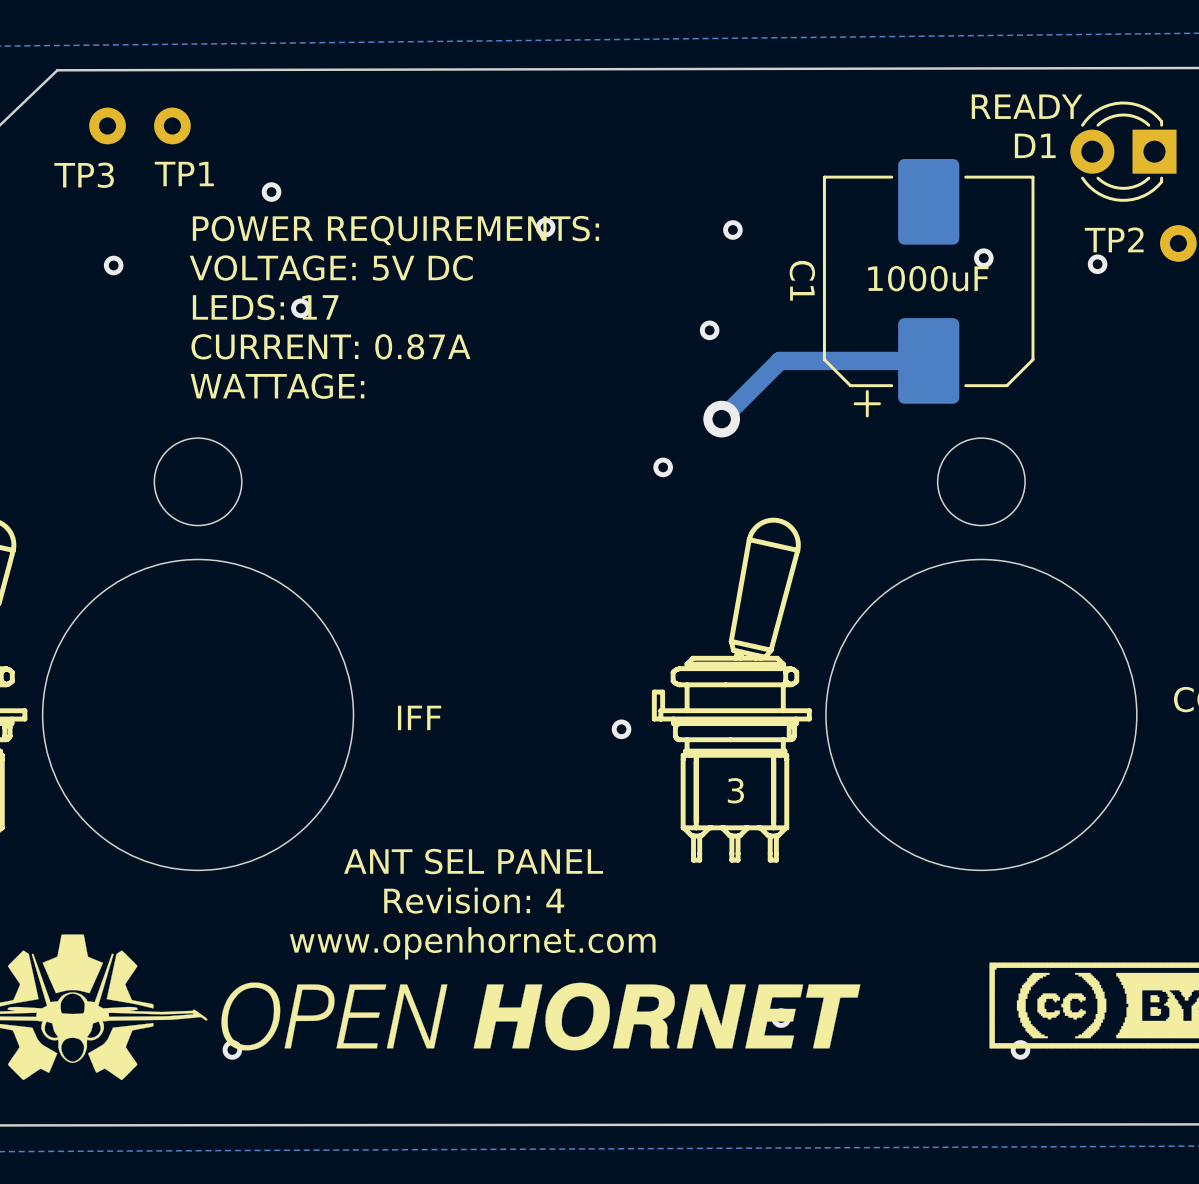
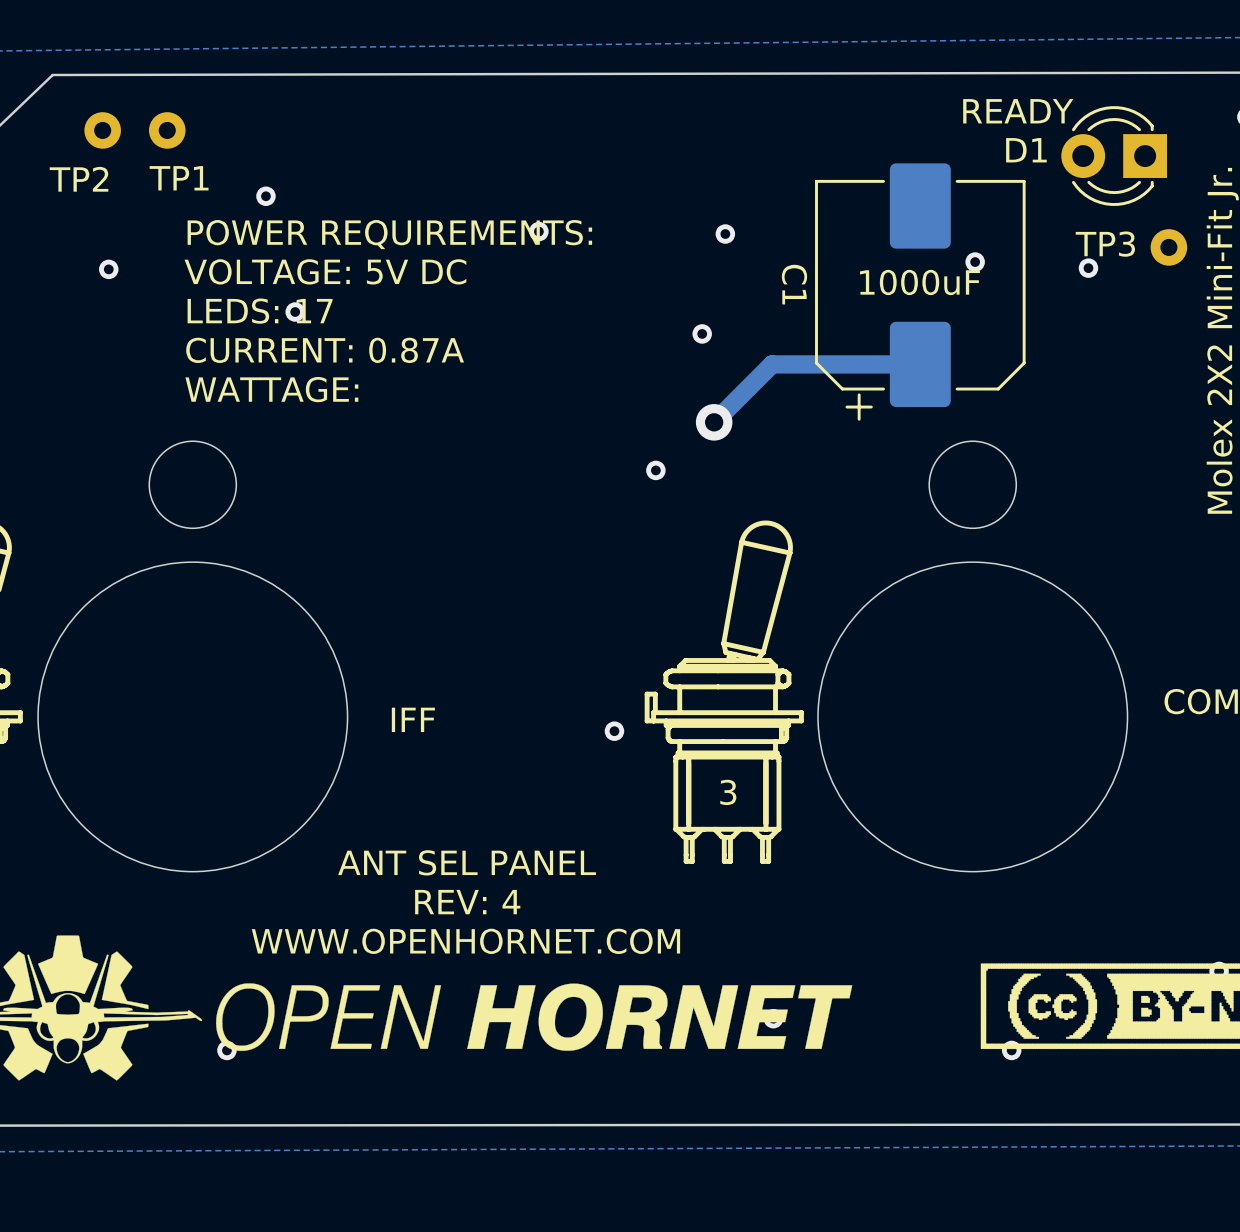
TP3 name: TP3 (84, 175) -> TP2 (79, 179)
TP2 name: TP2 (1114, 239) -> TP3 (1105, 244)
text: Revision: 4 (474, 900) -> REV: 4 (467, 902)
text: www.openhornet.com (472, 943) -> WWW.OPENHORNET.COM (465, 941)

